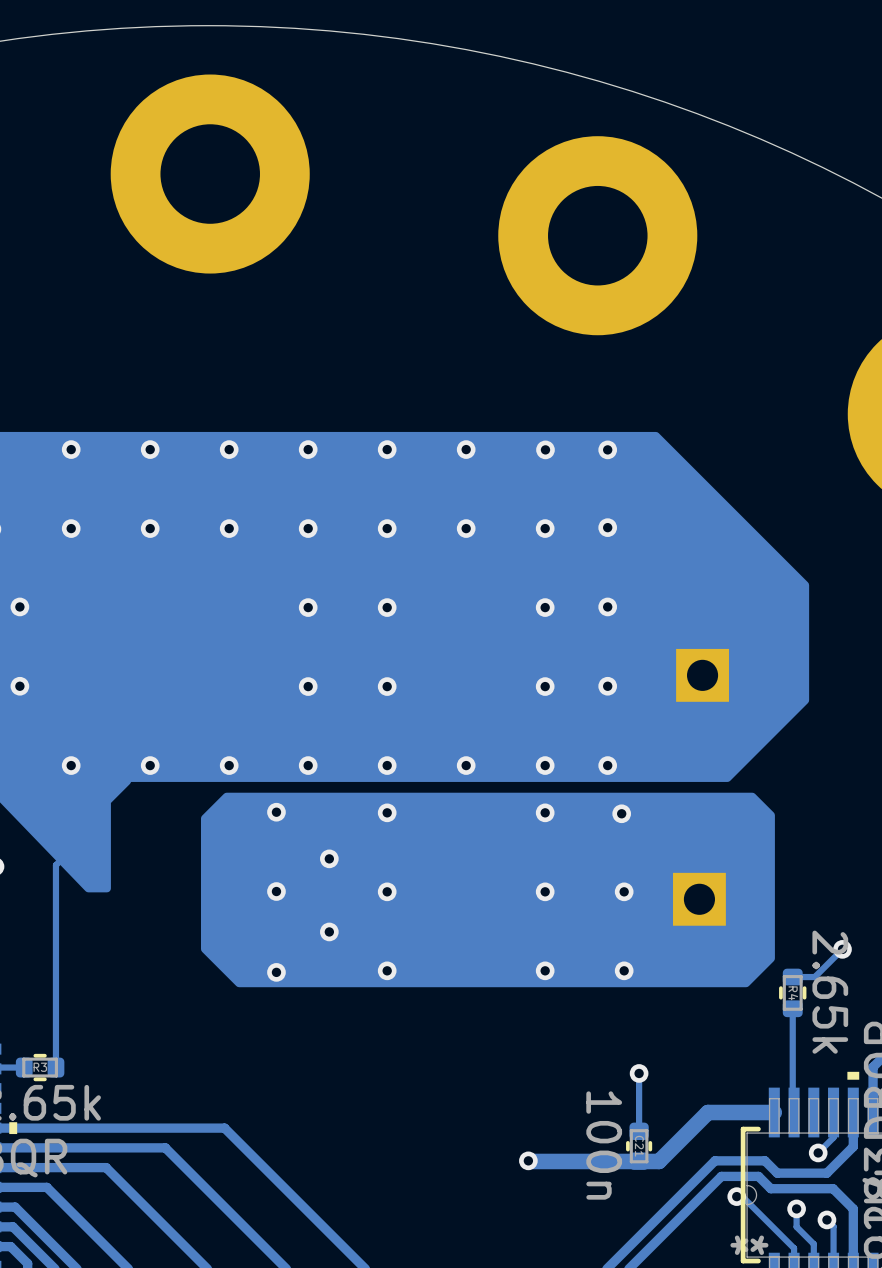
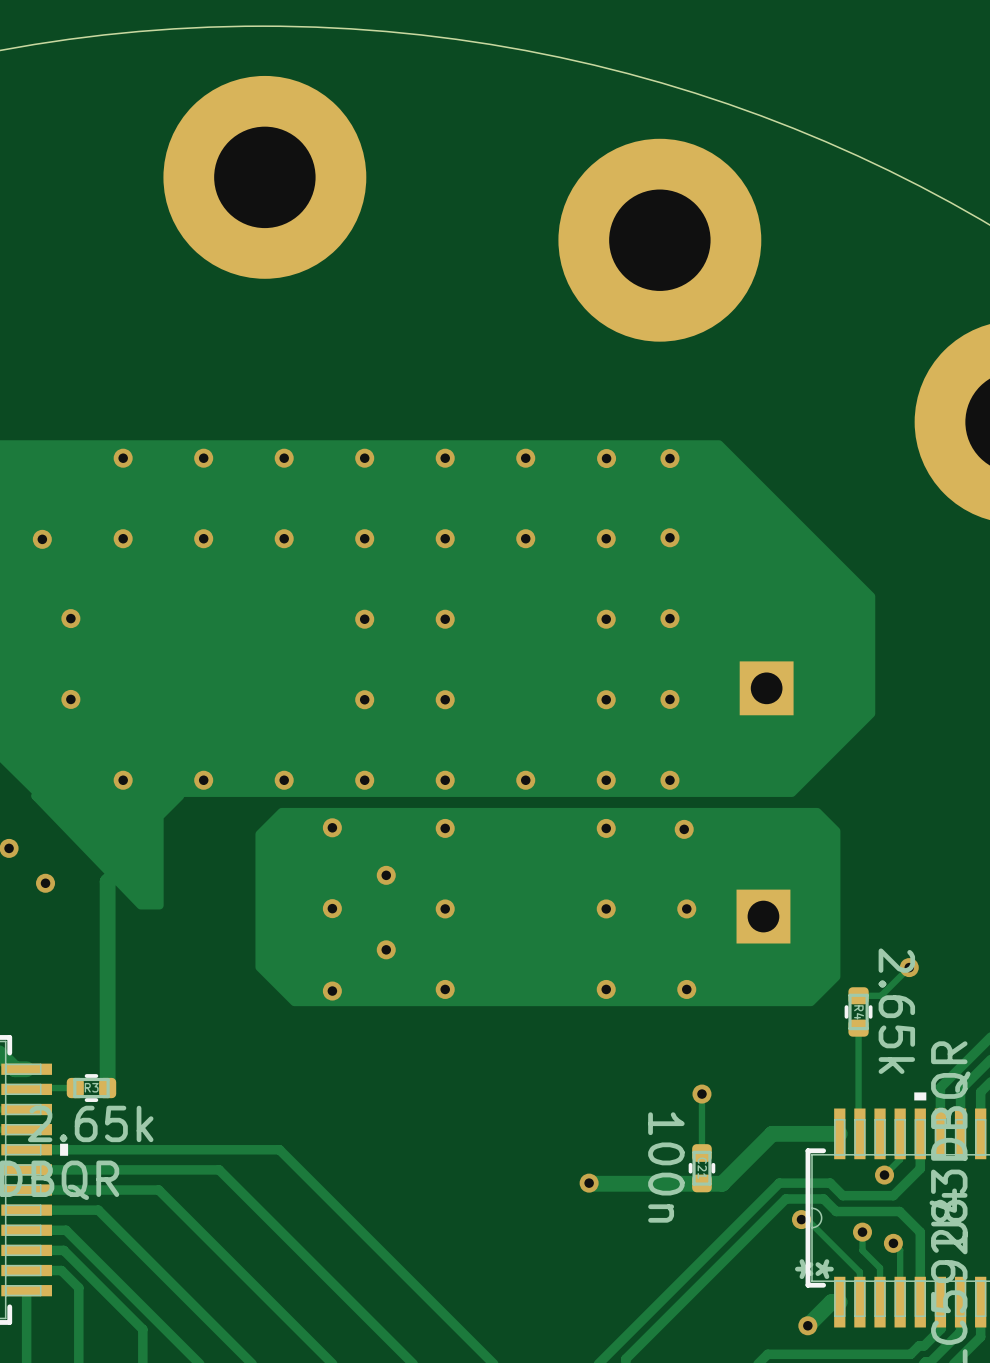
track width: thin (61, 859) (55, 865) (55, 1067) -> thick (113, 875) (107, 881) (107, 1088)

